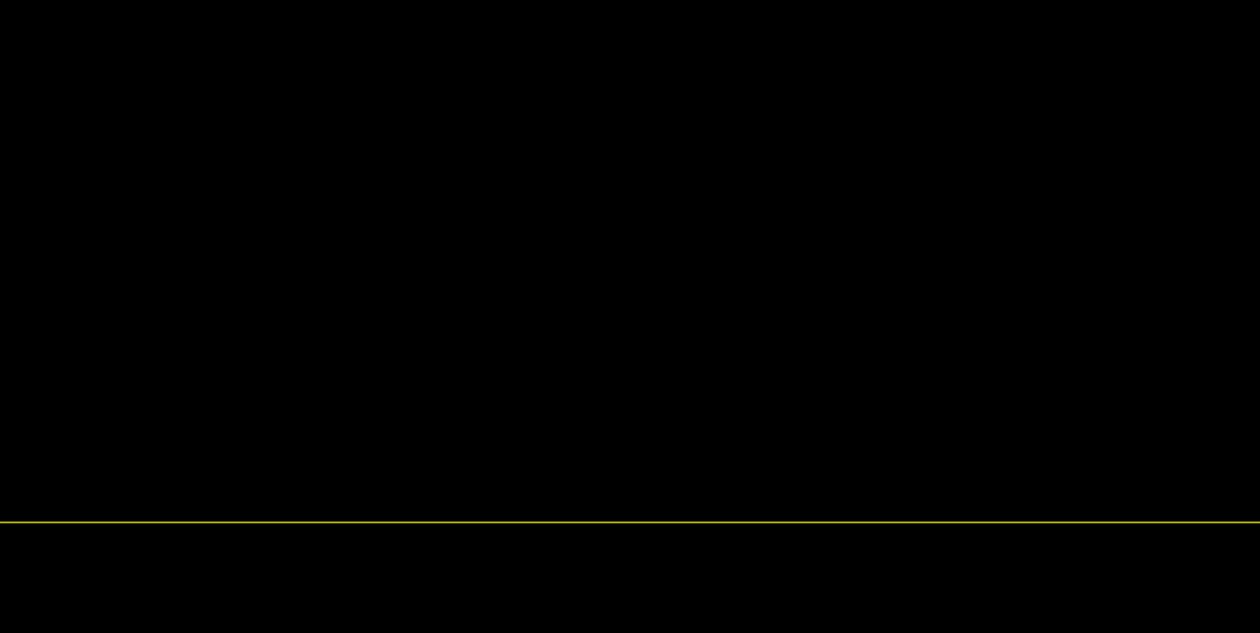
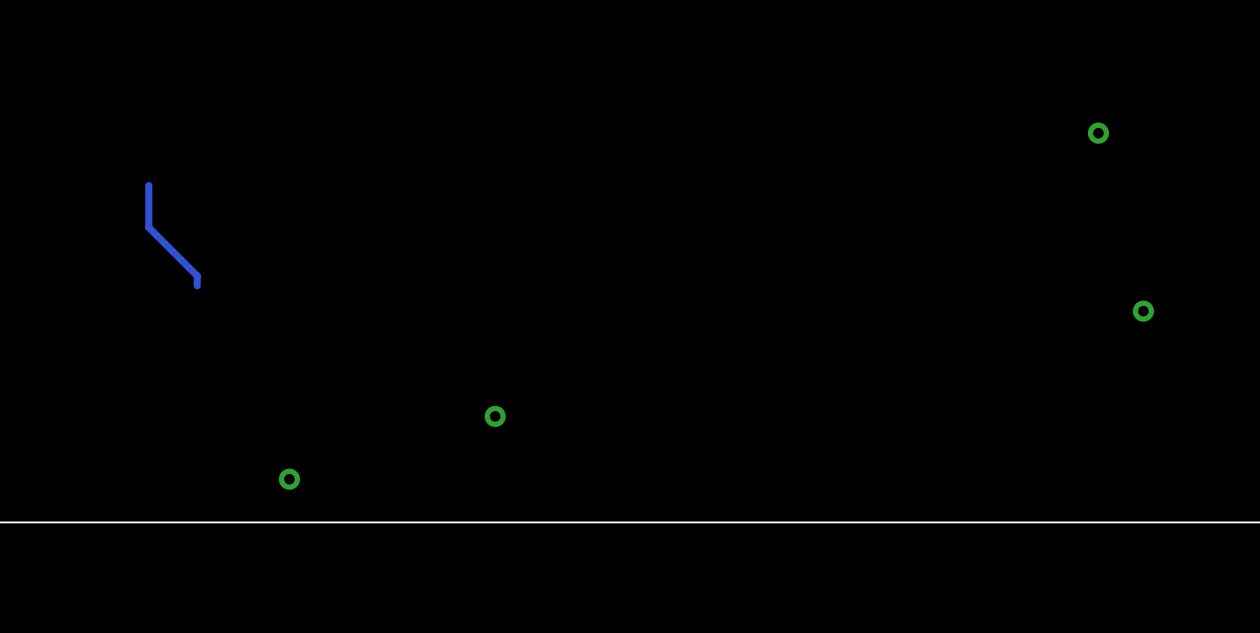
via: none -> (1098, 133)
track: none -> (148, 185) (148, 227) (197, 275) (197, 285)
via: none -> (1143, 311)
via: none -> (495, 416)
via: none -> (289, 479)

